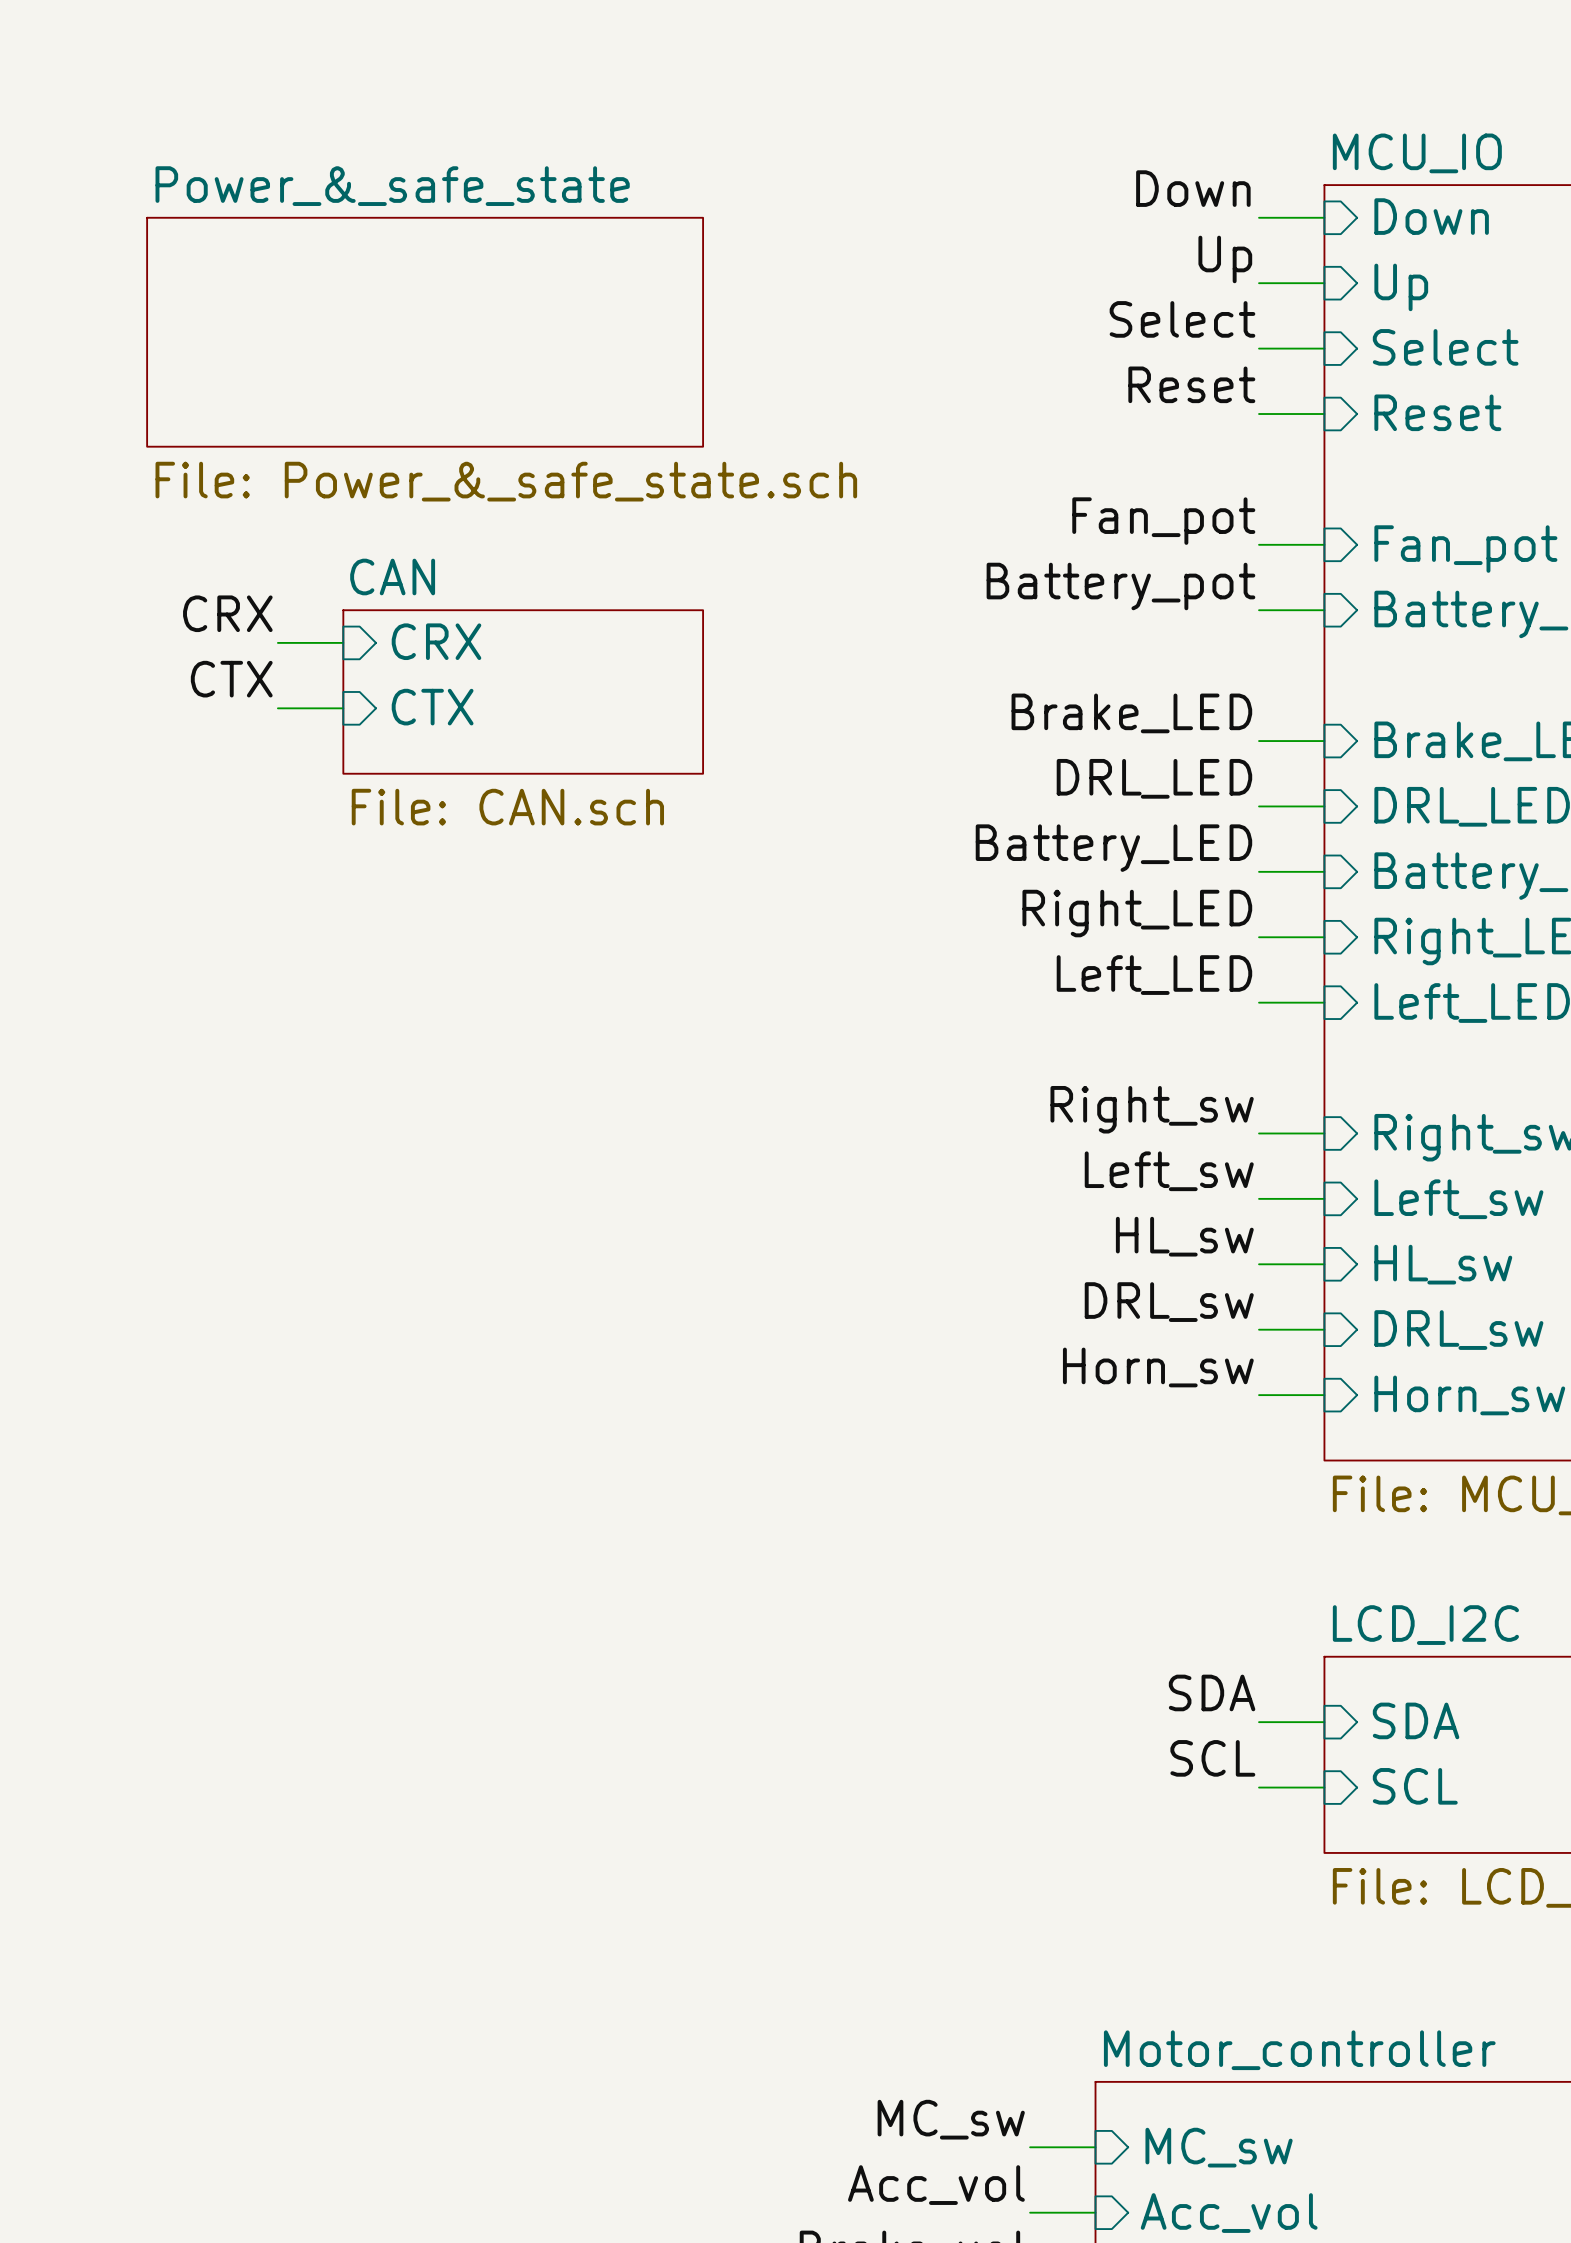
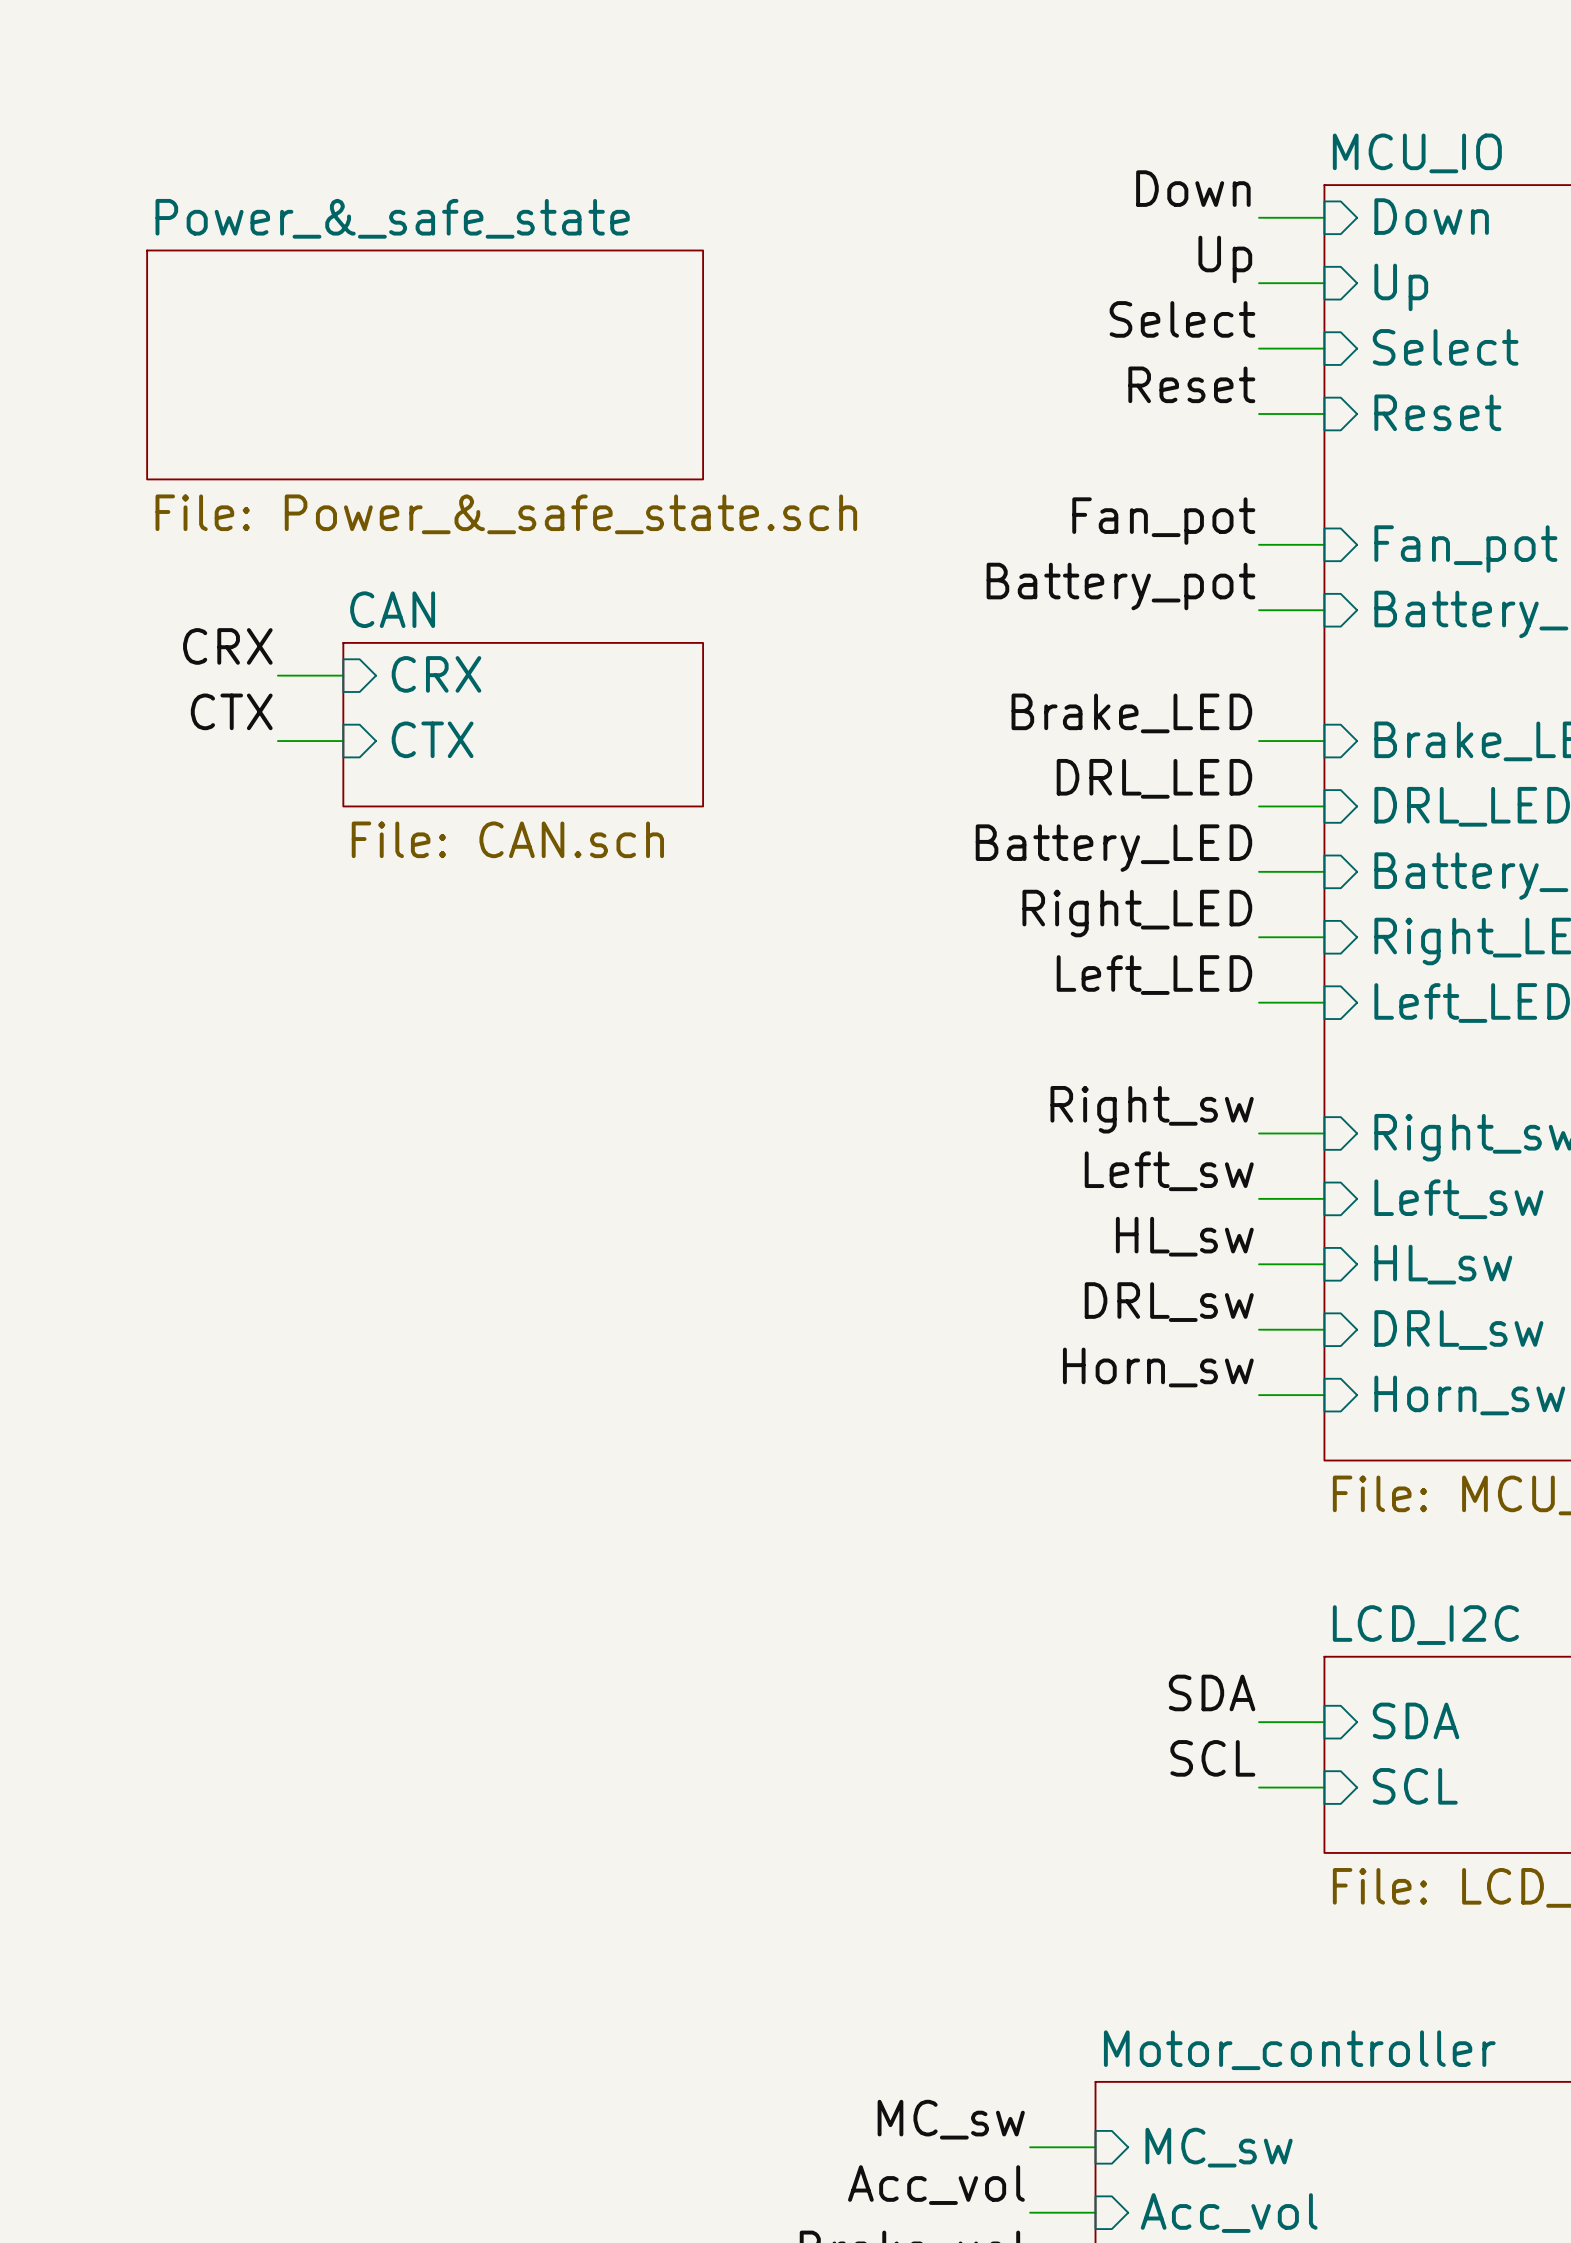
sheet Power_&_safe_state position: (425, 332) -> (425, 364)
label position: CRX (227, 613) -> CRX (227, 646)
sheet pin position: CRX (436, 641) -> CRX (436, 674)
wire: (277, 642) (343, 642) -> (277, 675) (343, 675)
label position: CTX (231, 679) -> CTX (231, 711)
sheet CAN position: (523, 691) -> (523, 724)
sheet pin position: CTX (432, 707) -> CTX (432, 739)
wire: (277, 708) (343, 708) -> (277, 741) (343, 741)

